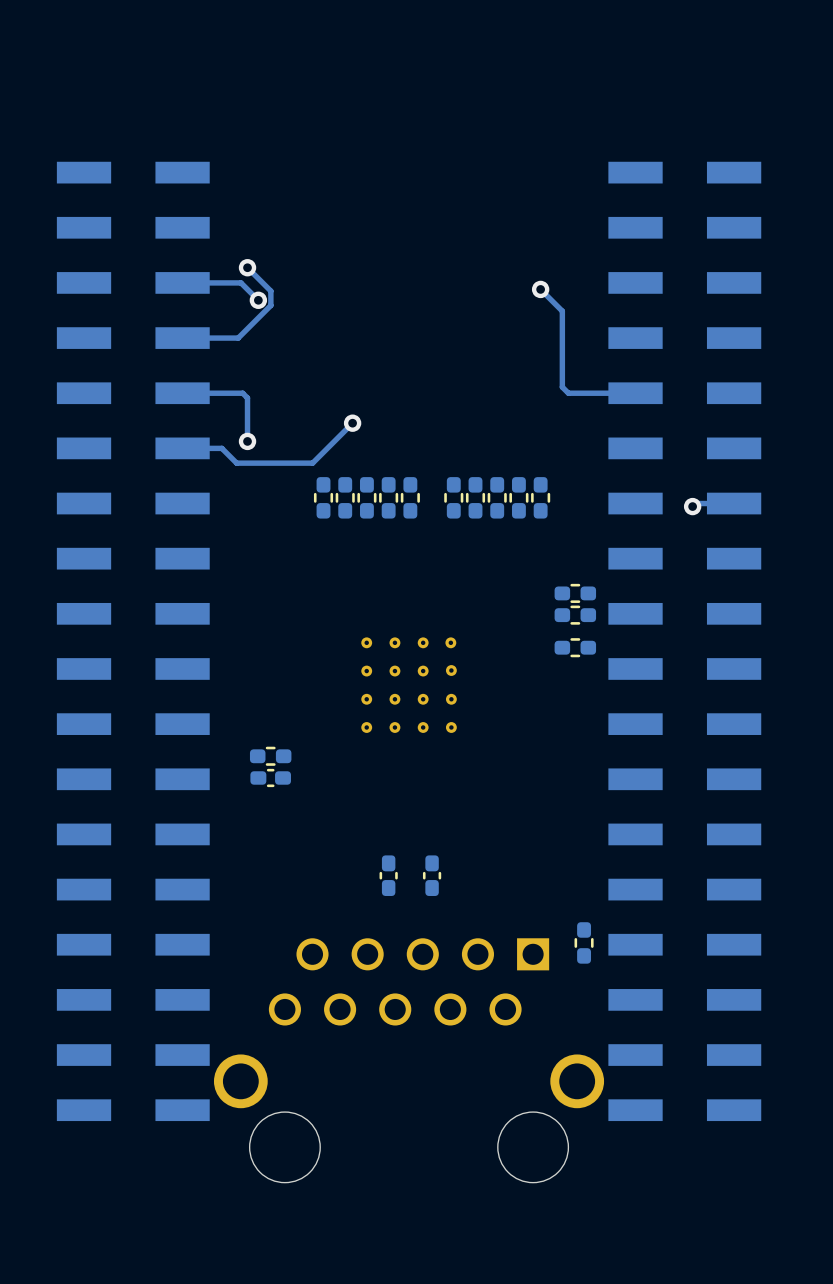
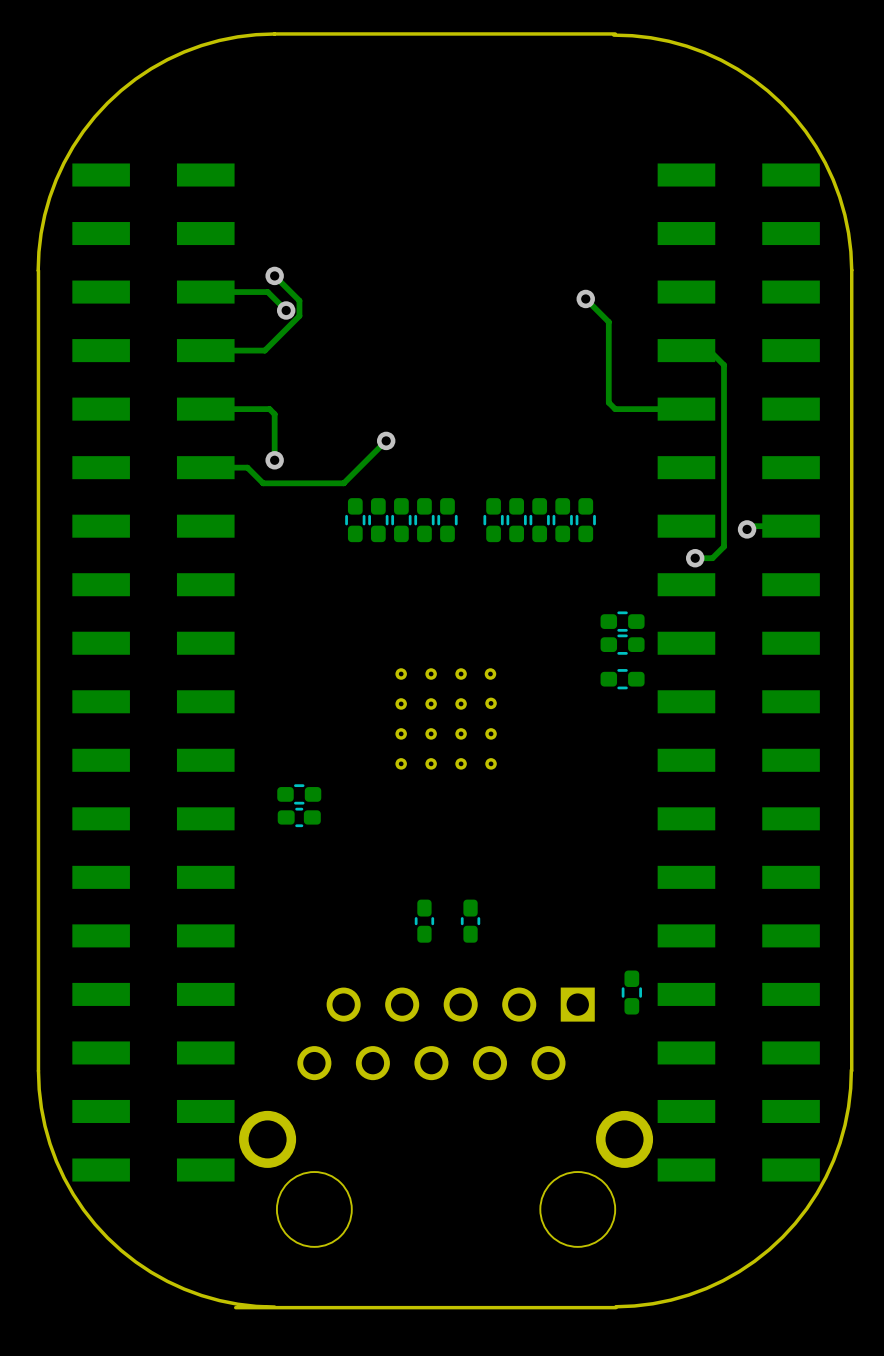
board edge: none -> (615, 33) (256, 34) (219, 40) (184, 51) (151, 68) (121, 90) (83, 131) (63, 163) (49, 197) (41, 233) (38, 270)
board edge: none -> (613, 35) (650, 37) (686, 46) (721, 60) (753, 79) (794, 116) (816, 146) (833, 179) (844, 215) (851, 270) (851, 1070)
board edge: none -> (38, 270) (38, 1070) (44, 1126) (56, 1161) (73, 1194) (95, 1224) (121, 1250) (151, 1272) (184, 1289) (219, 1300) (274, 1307)
track: none -> (709, 350) (724, 365) (724, 546) (712, 558) (695, 558)
via: none -> (695, 558)
board edge: none -> (851, 1069) (845, 1125) (833, 1160) (816, 1193) (782, 1237) (754, 1261) (706, 1288) (652, 1303) (615, 1306)
board edge: none -> (615, 1307) (235, 1307)

